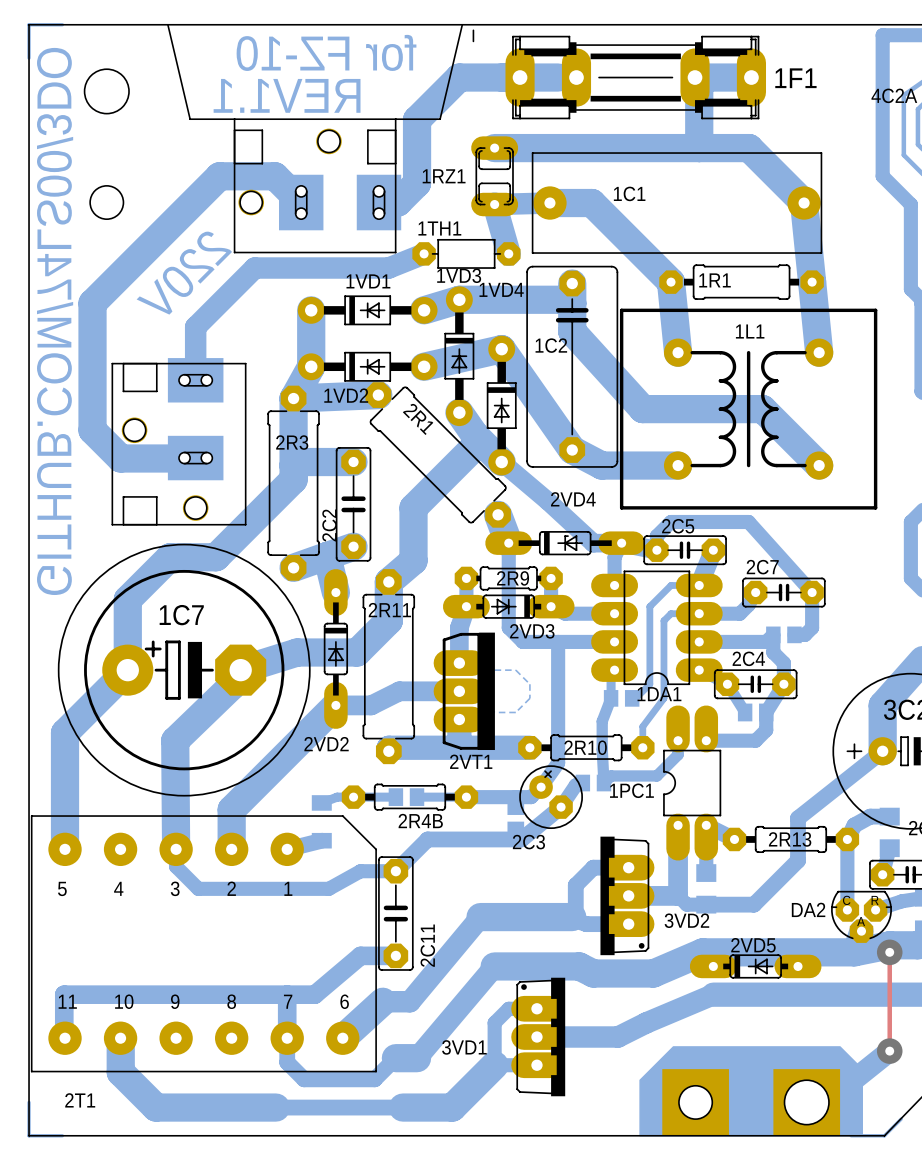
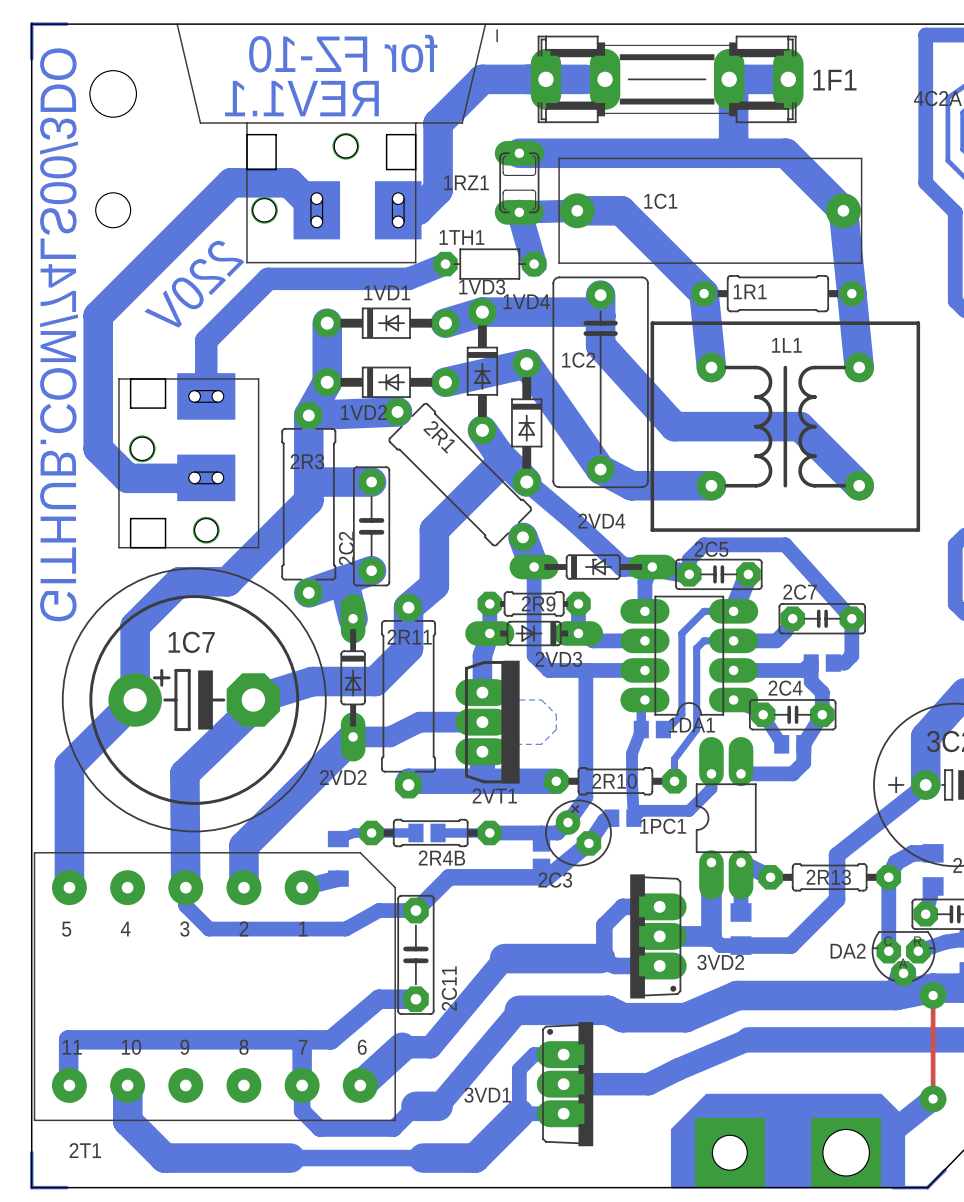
2VD5: (755, 966) -> none

